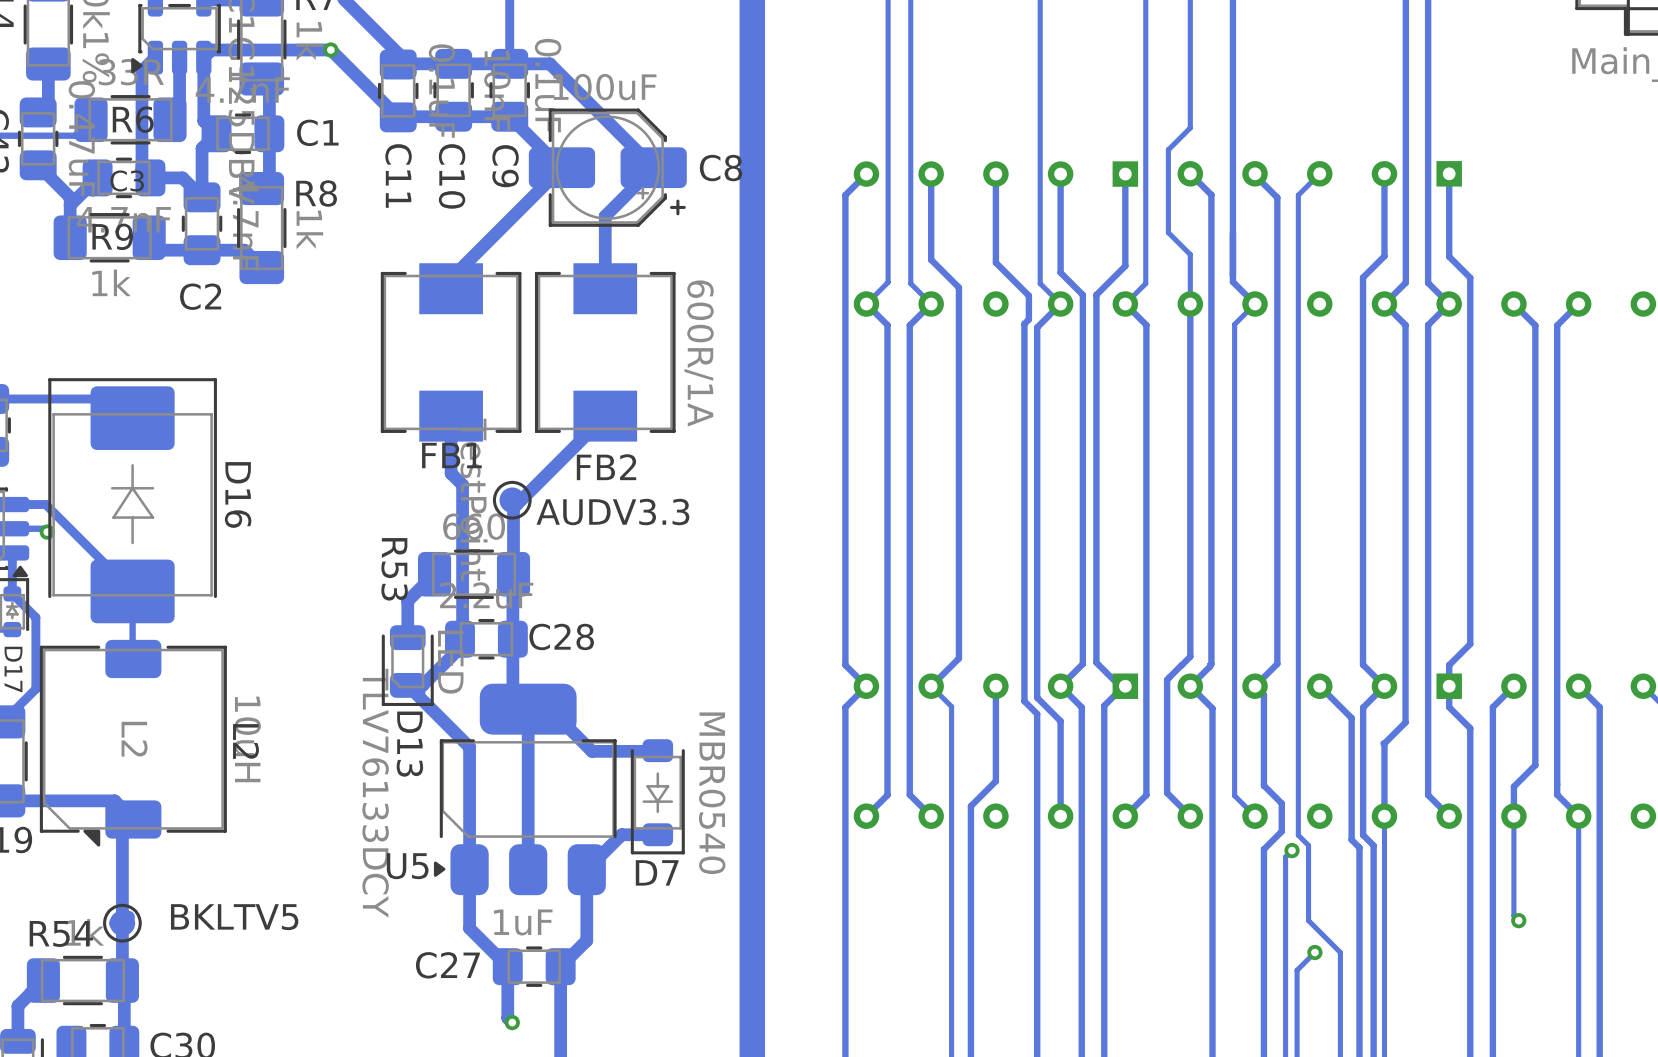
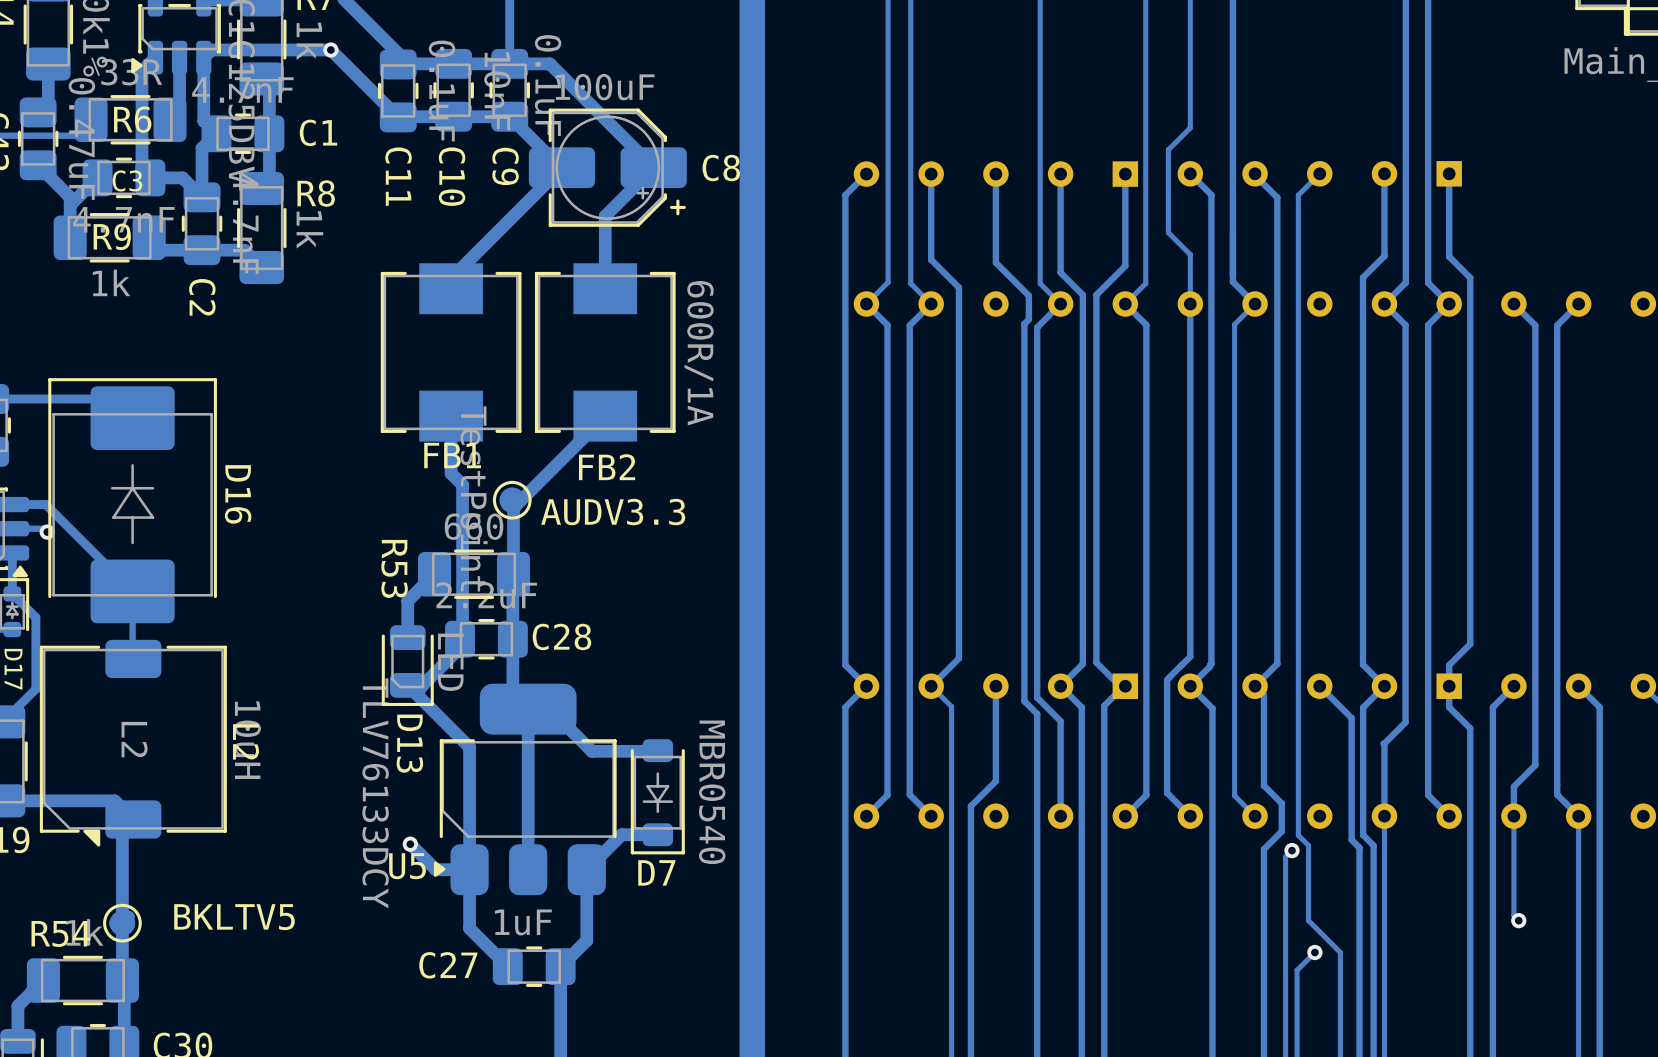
C2 name rotation: 0° (200, 296) -> 90° clockwise (202, 297)
track: none -> (410, 844) (435, 869) (469, 869)
via: none -> (410, 844)
track: (507, 966) (507, 1018) (512, 1022) -> none
via: (512, 1022) -> none

